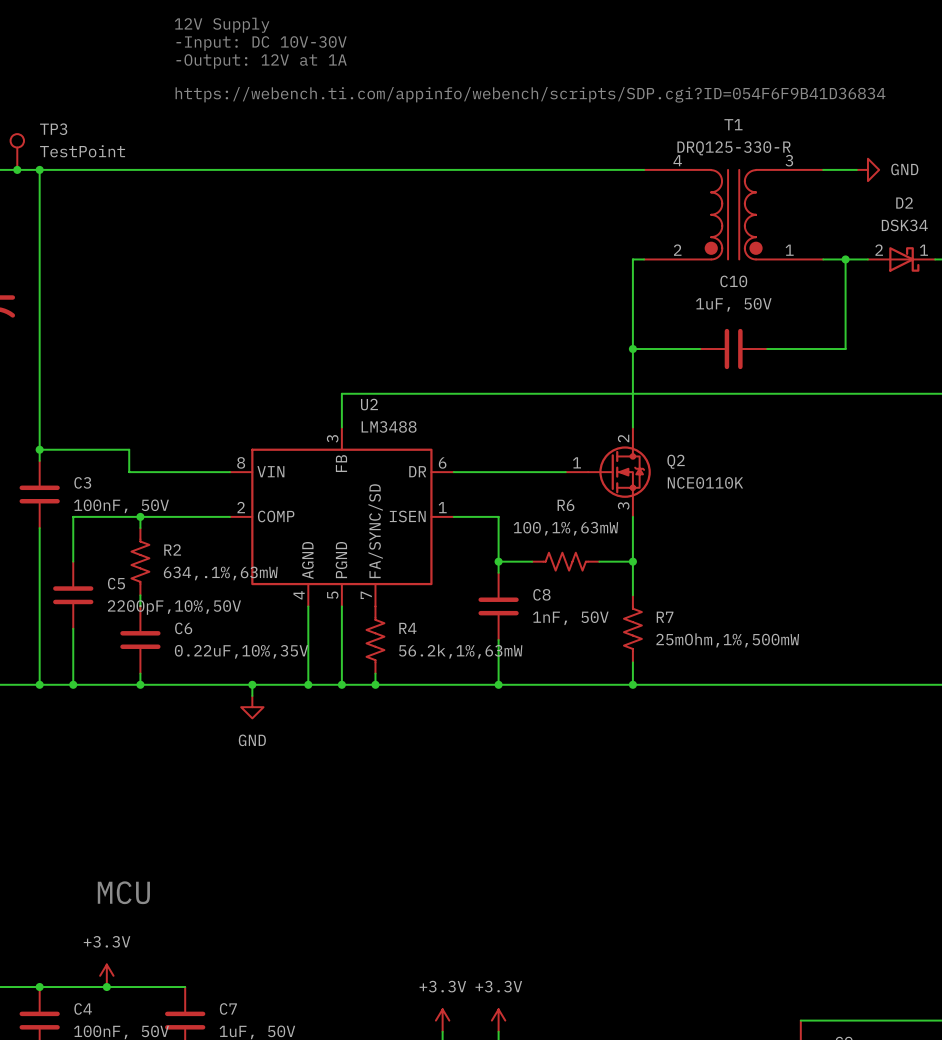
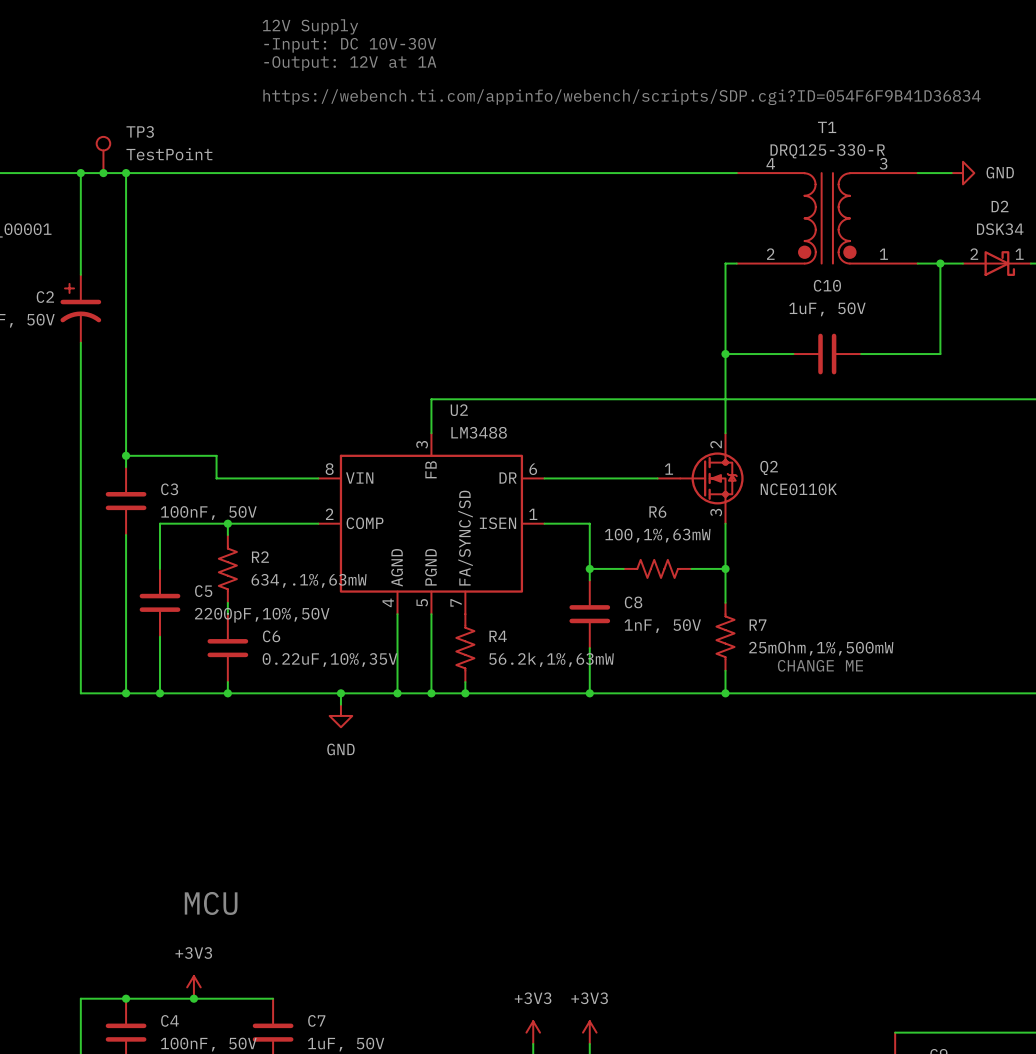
text: none -> CHANGE ME (820, 665)
power symbol: +3.3V (106, 975) -> +3V3 (193, 987)
power symbol: +3.3V (442, 1020) -> +3V3 (533, 1032)
power symbol: +3.3V (498, 1020) -> +3V3 (589, 1032)

